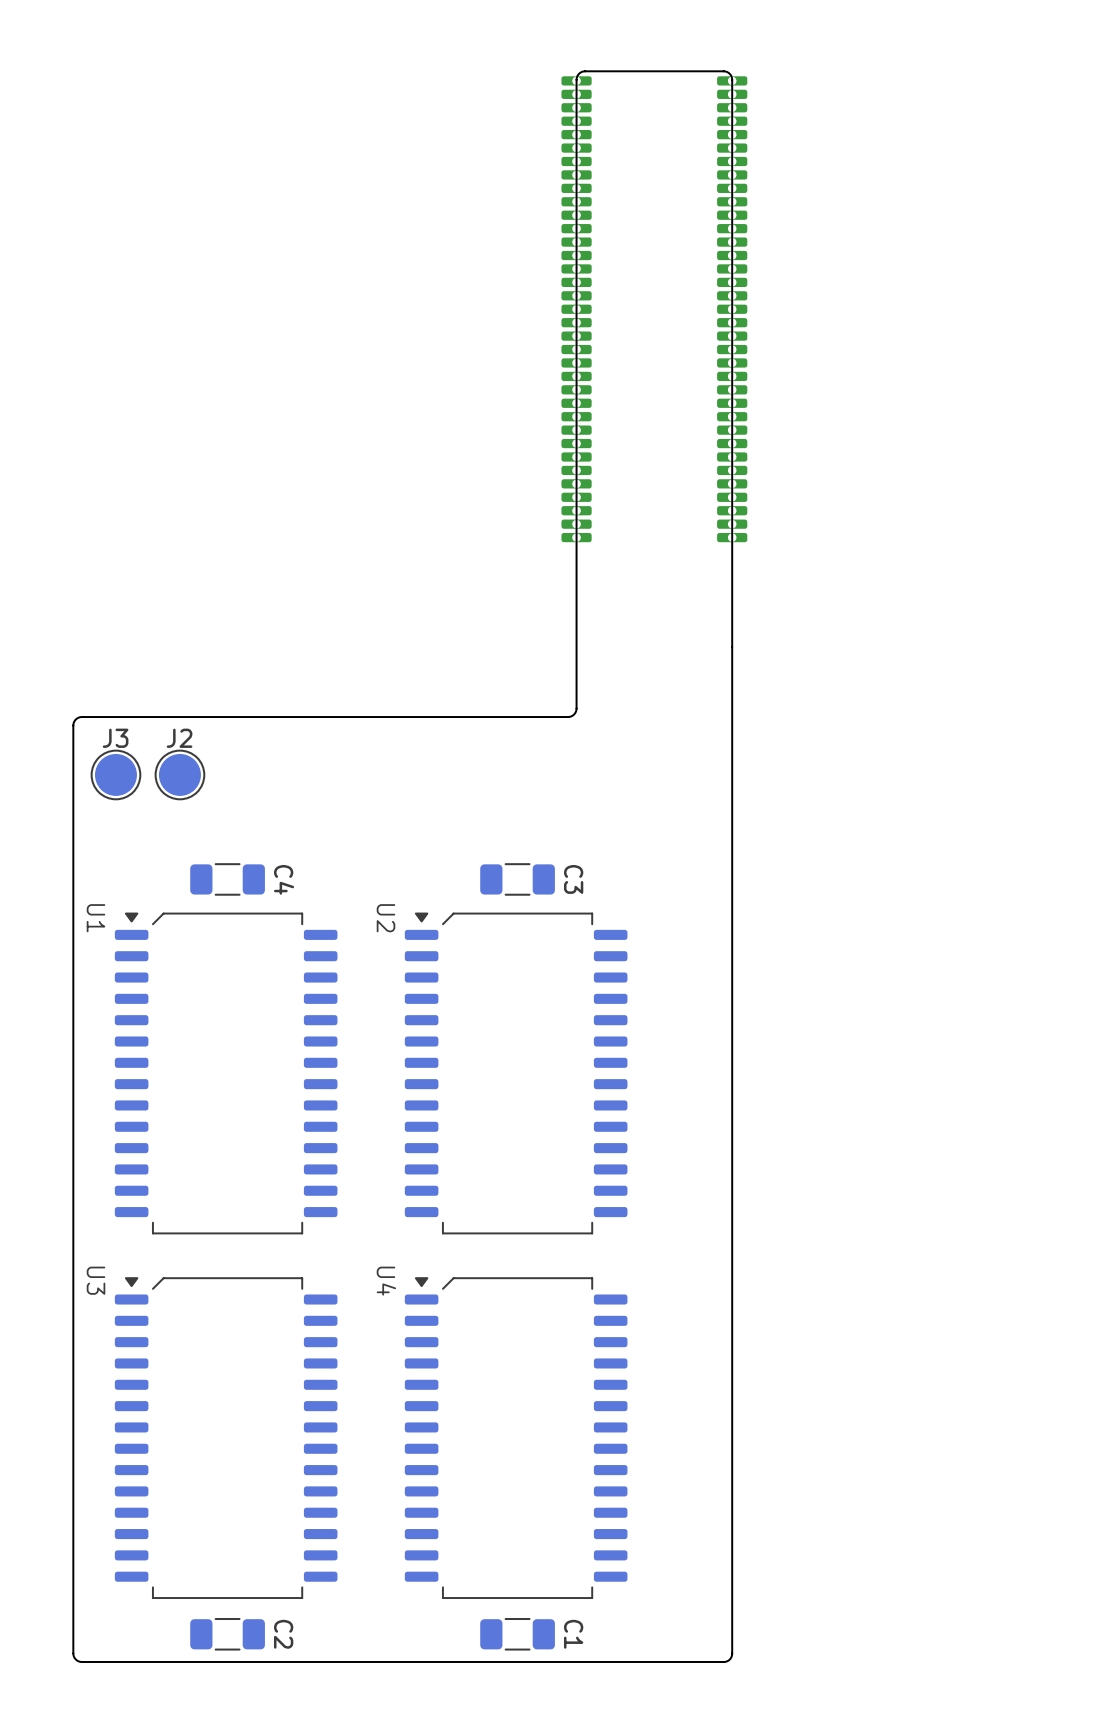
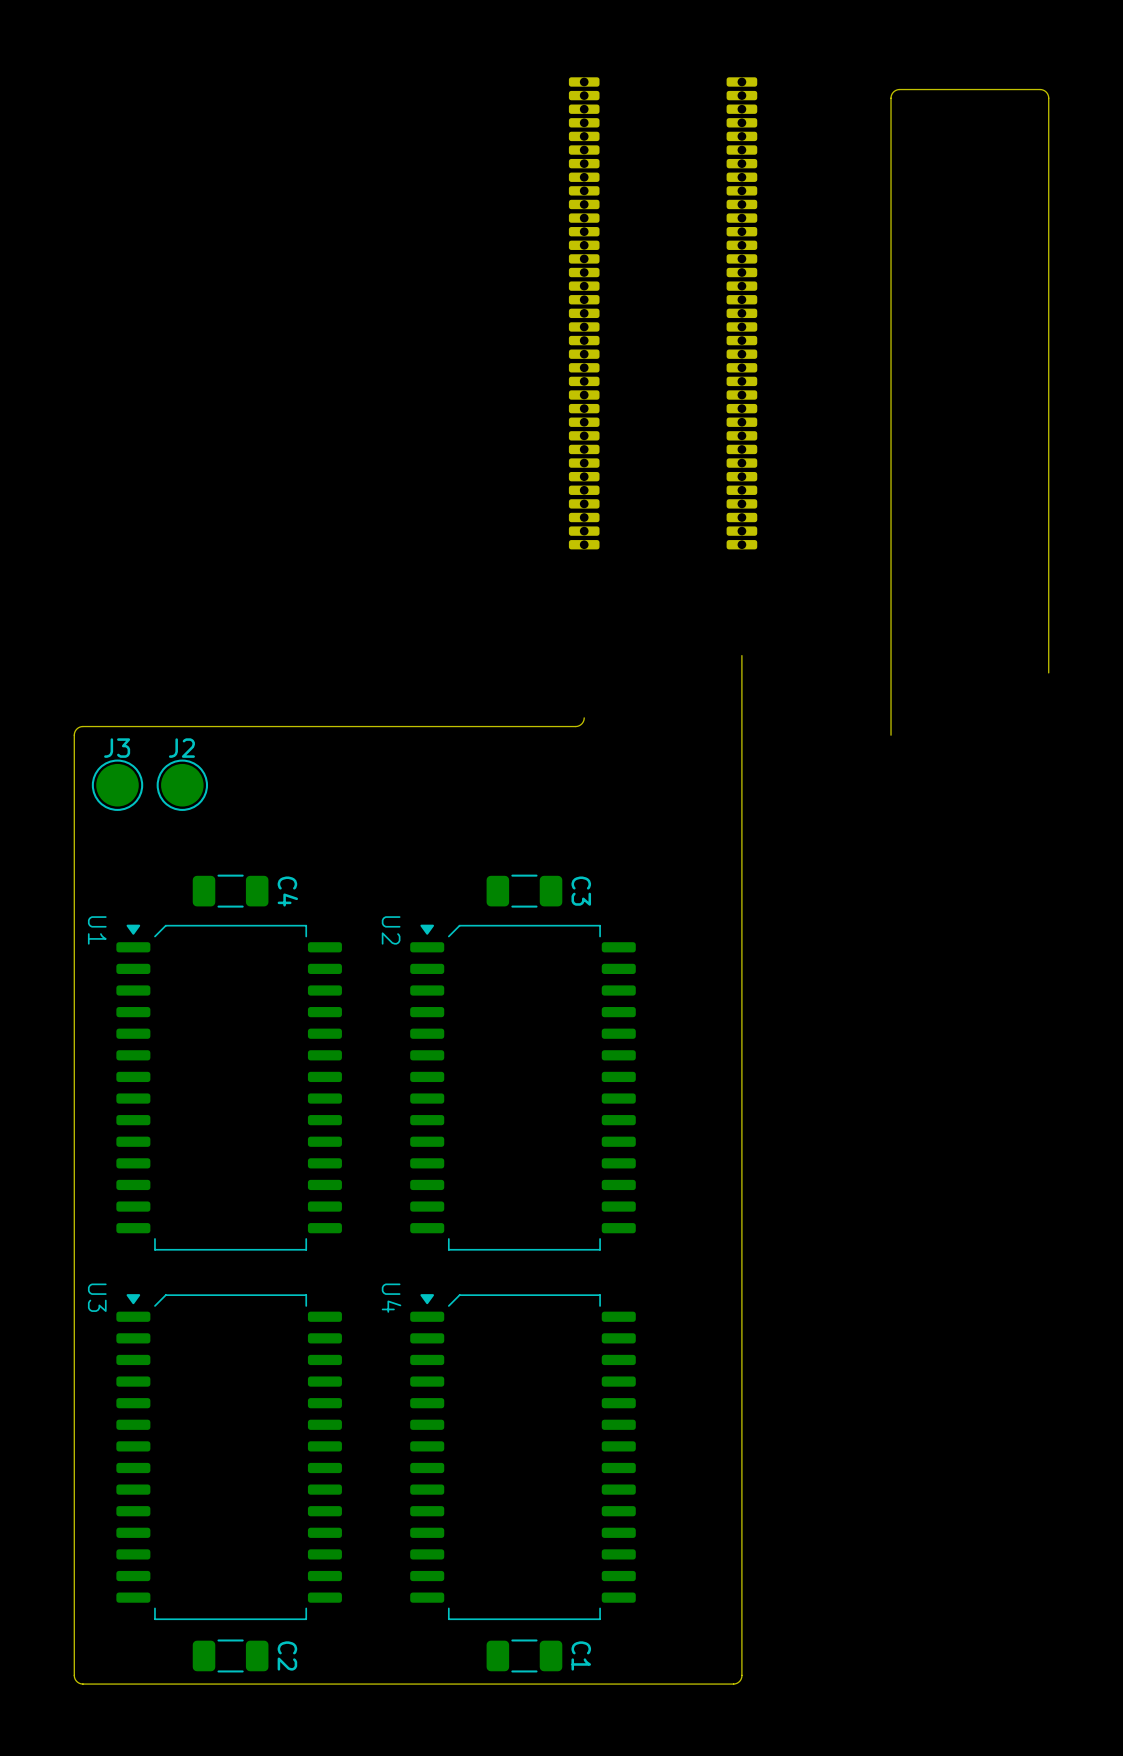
board edge: (732, 647) (731, 77) (728, 73) (723, 71) (582, 71) (578, 74) (576, 79) (576, 708) -> (1048, 672) (1048, 95) (1045, 91) (1040, 89) (897, 89) (892, 92) (891, 98) (891, 735)

